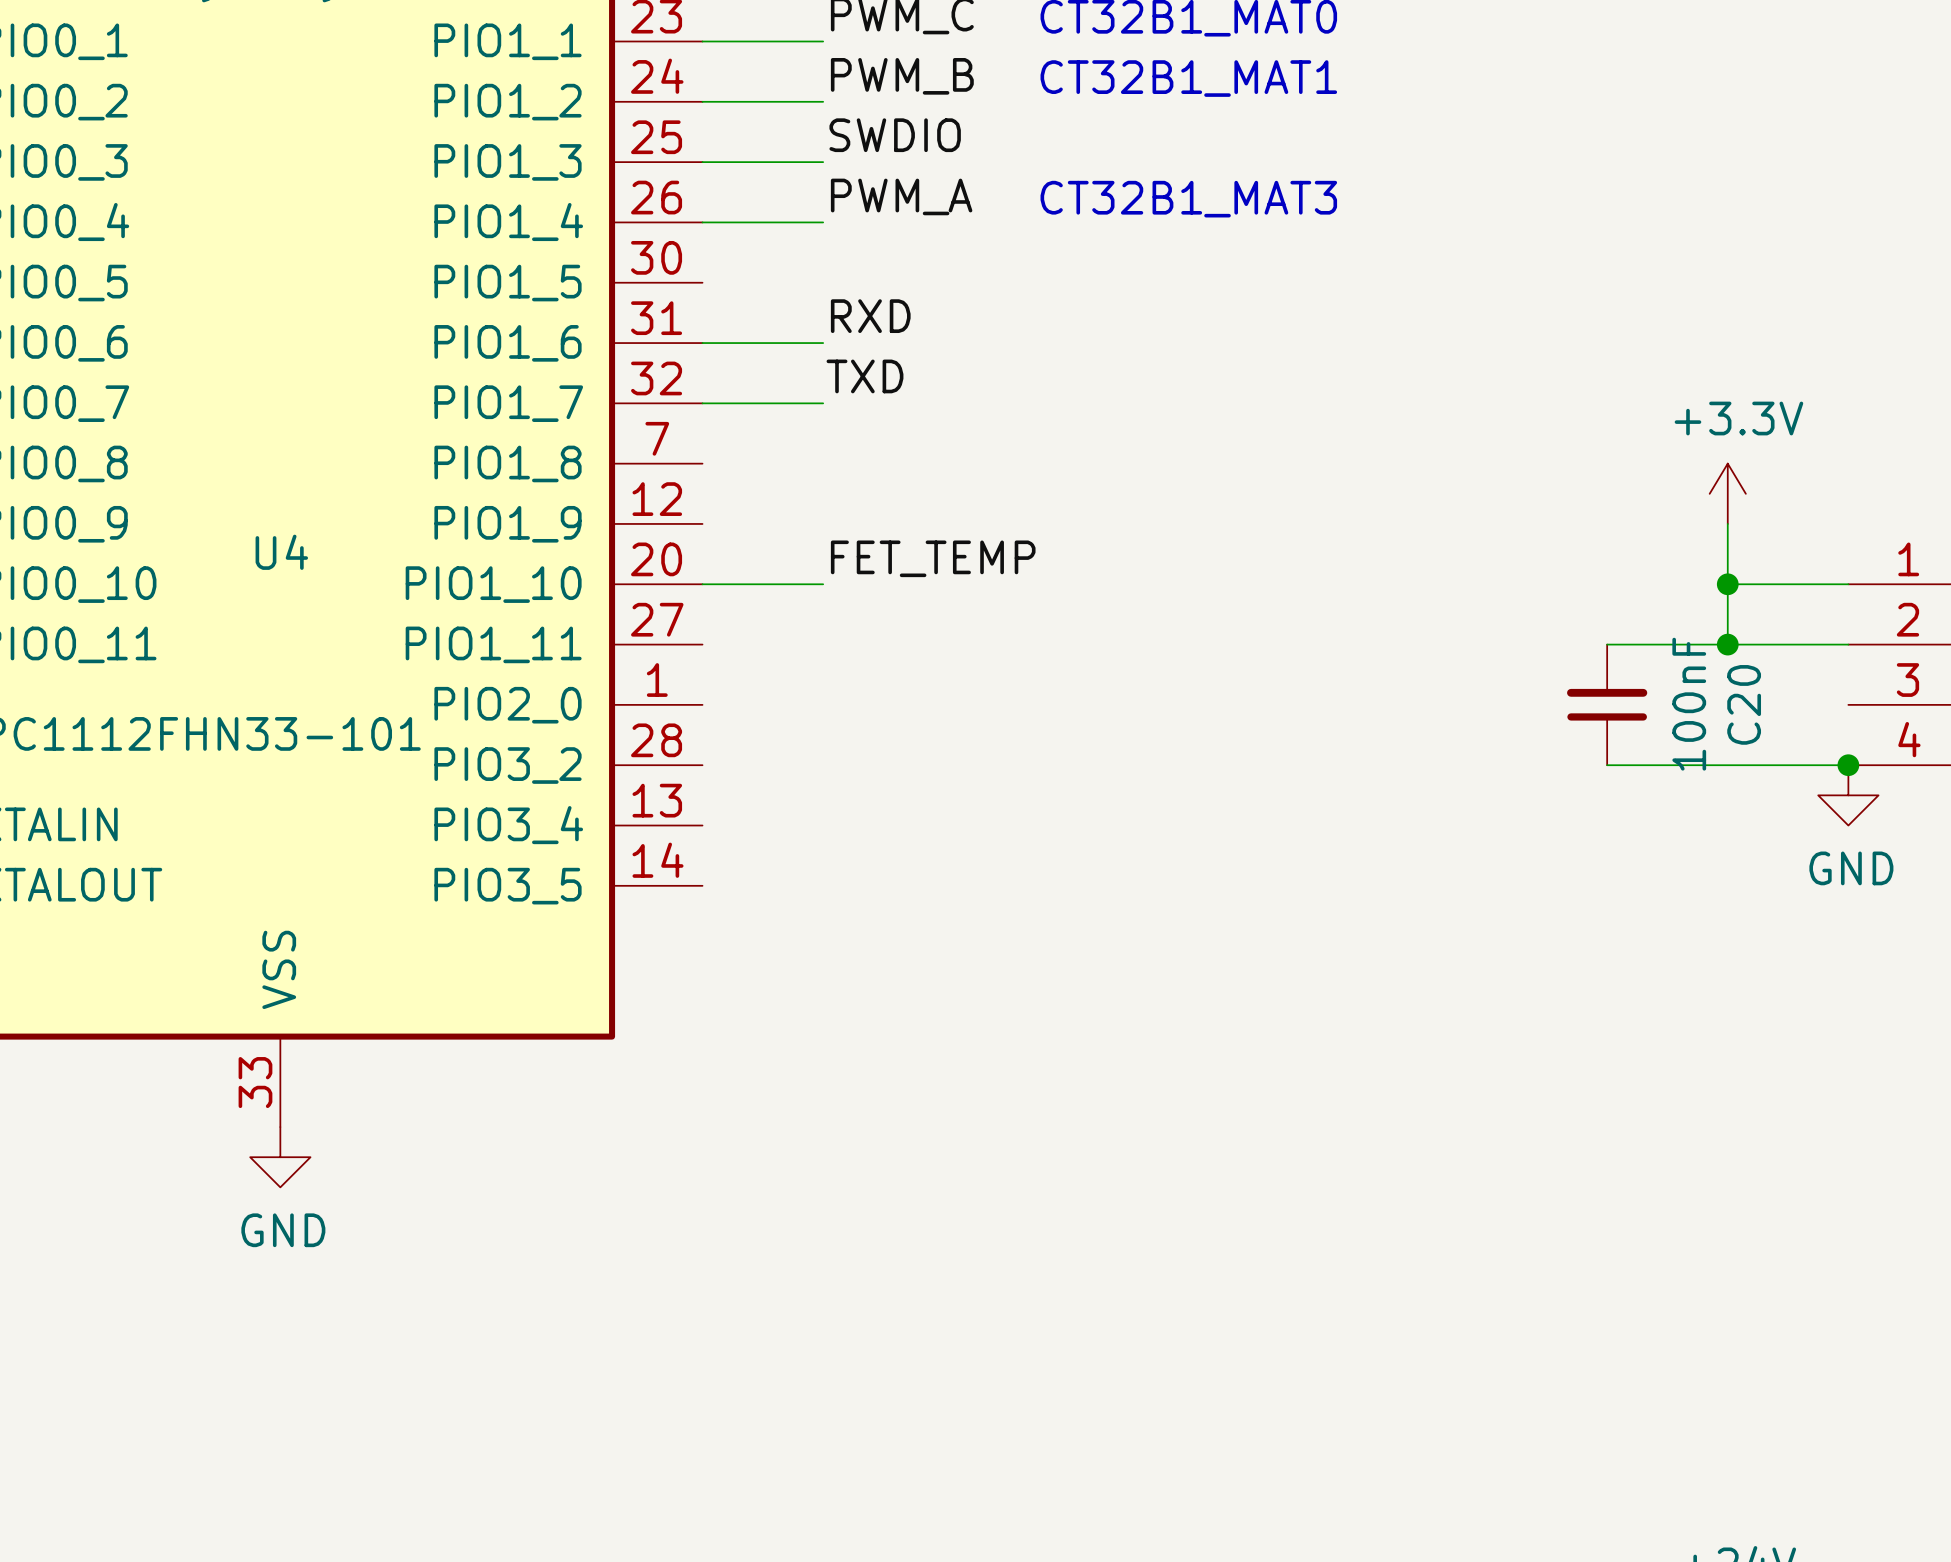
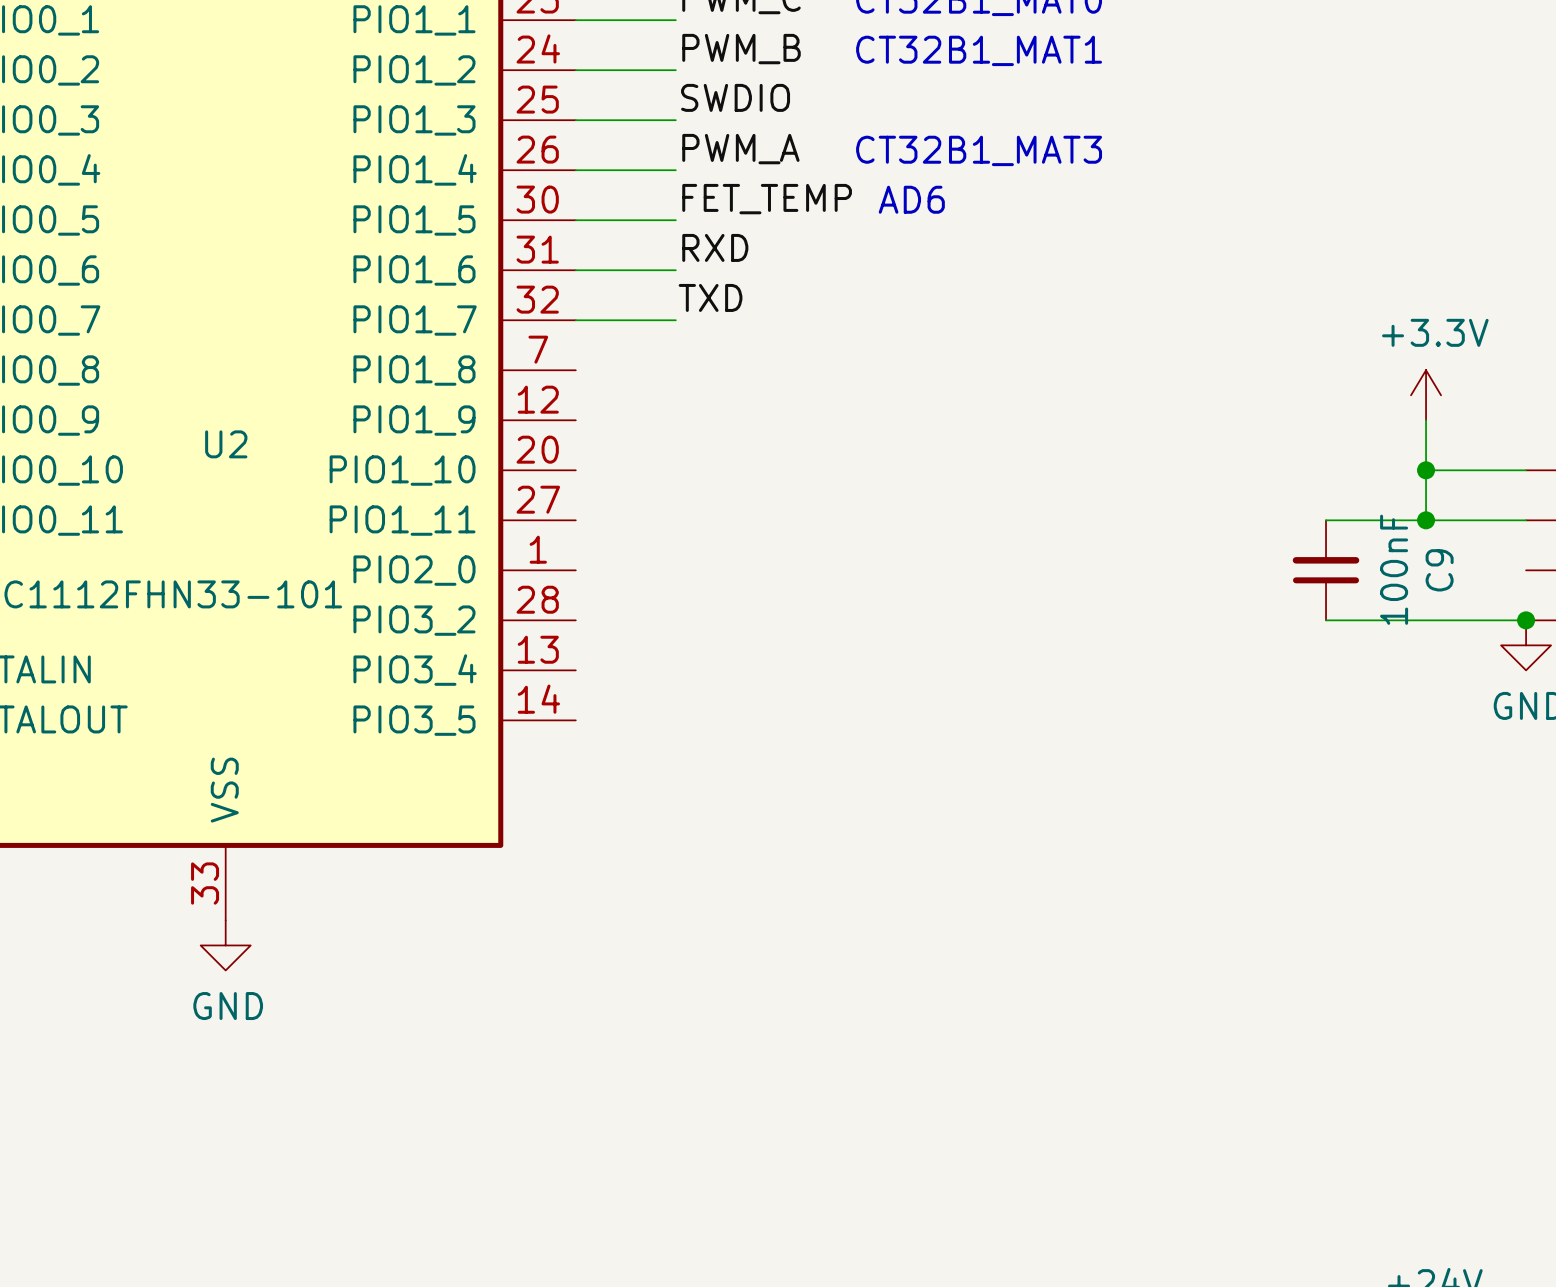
text: none -> AD6 (911, 199)
U4 name: U4 (281, 552) -> U2 (226, 444)
label position: FET_TEMP (933, 558) -> FET_TEMP (767, 199)
wire: (702, 584) (823, 584) -> (575, 220) (675, 220)
C20 name: C20 (1744, 704) -> C9 (1439, 570)

